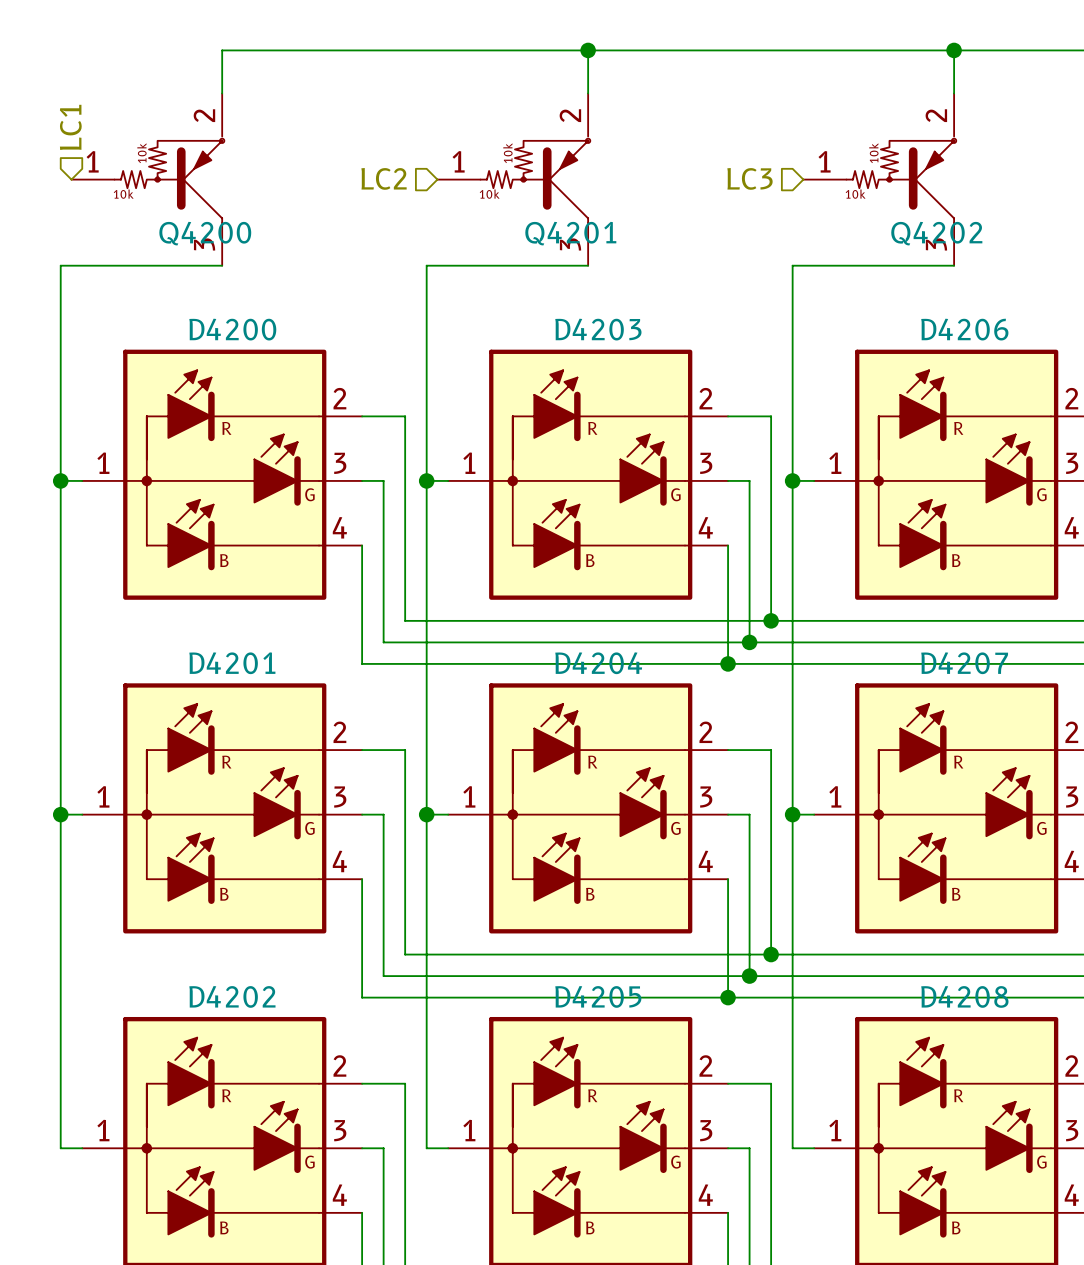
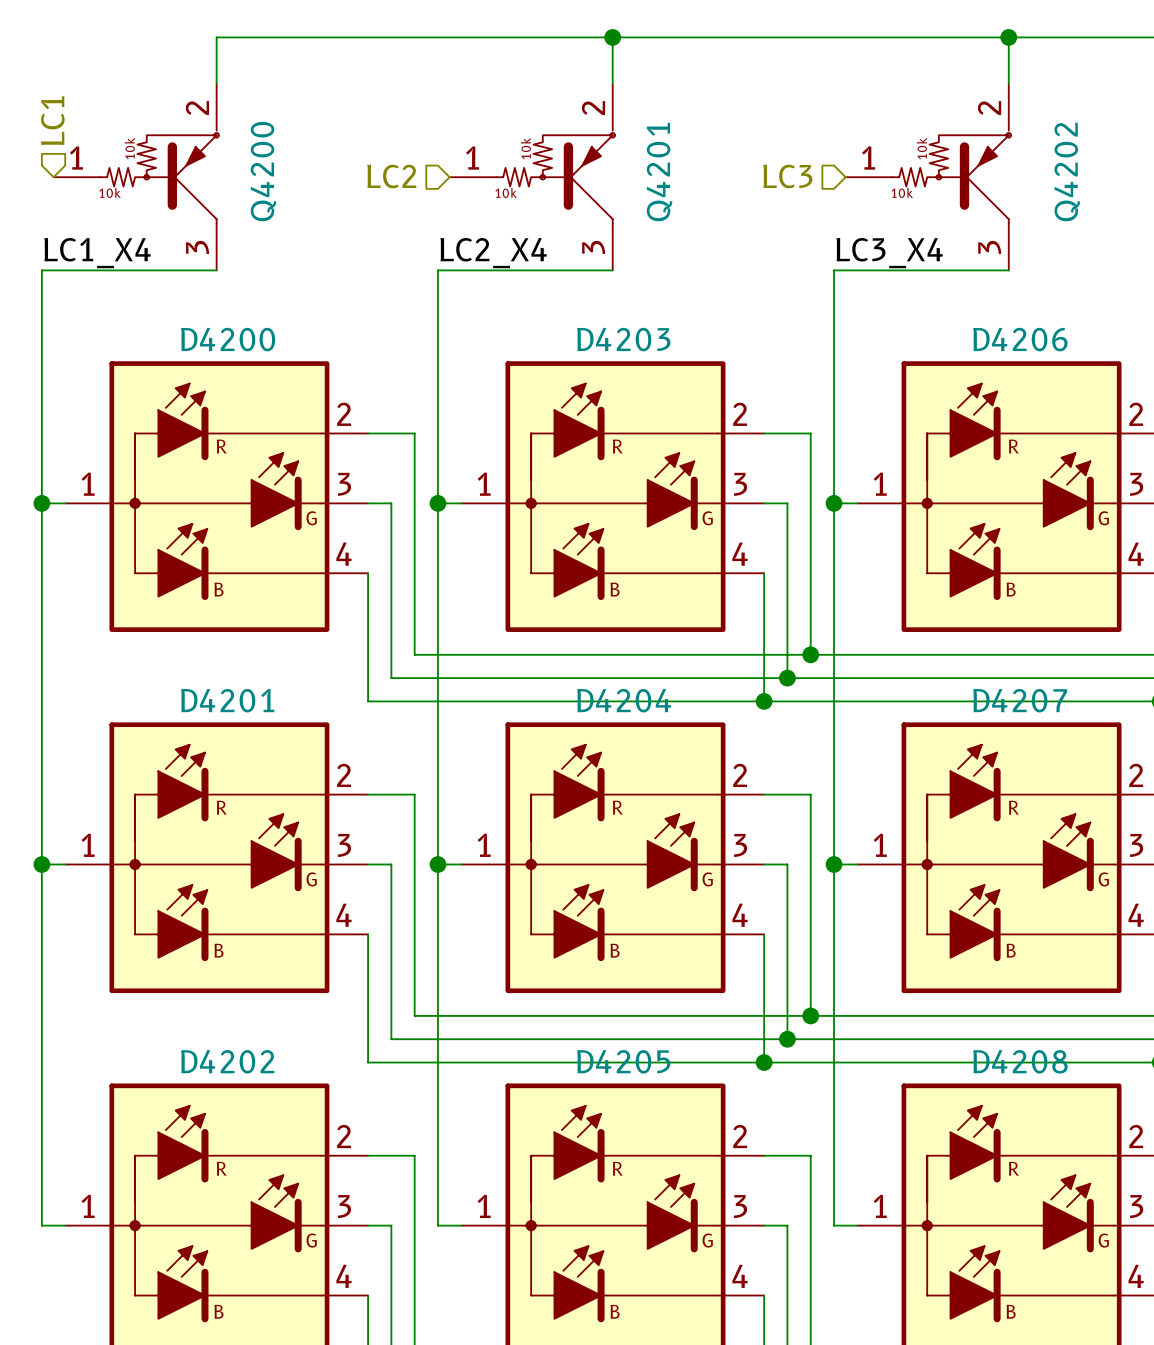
Q4200 name rotation: 0° (205, 233) -> 90° counterclockwise (263, 171)
Q4201 name rotation: 0° (570, 233) -> 90° counterclockwise (659, 172)
Q4202 name rotation: 0° (936, 233) -> 90° counterclockwise (1067, 172)
label: none -> LC1_X4 (97, 253)
label: none -> LC2_X4 (493, 253)
label: none -> LC3_X4 (889, 253)

